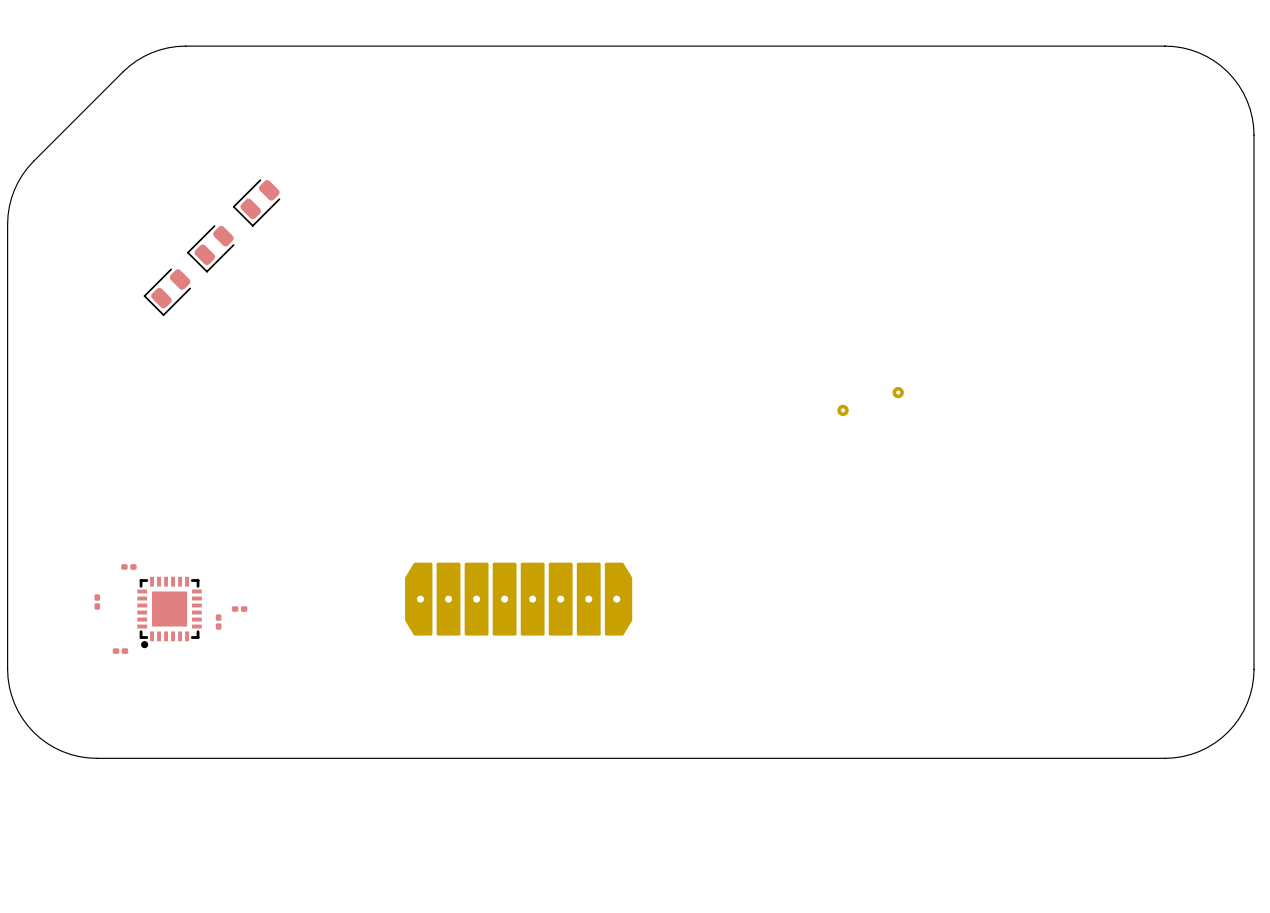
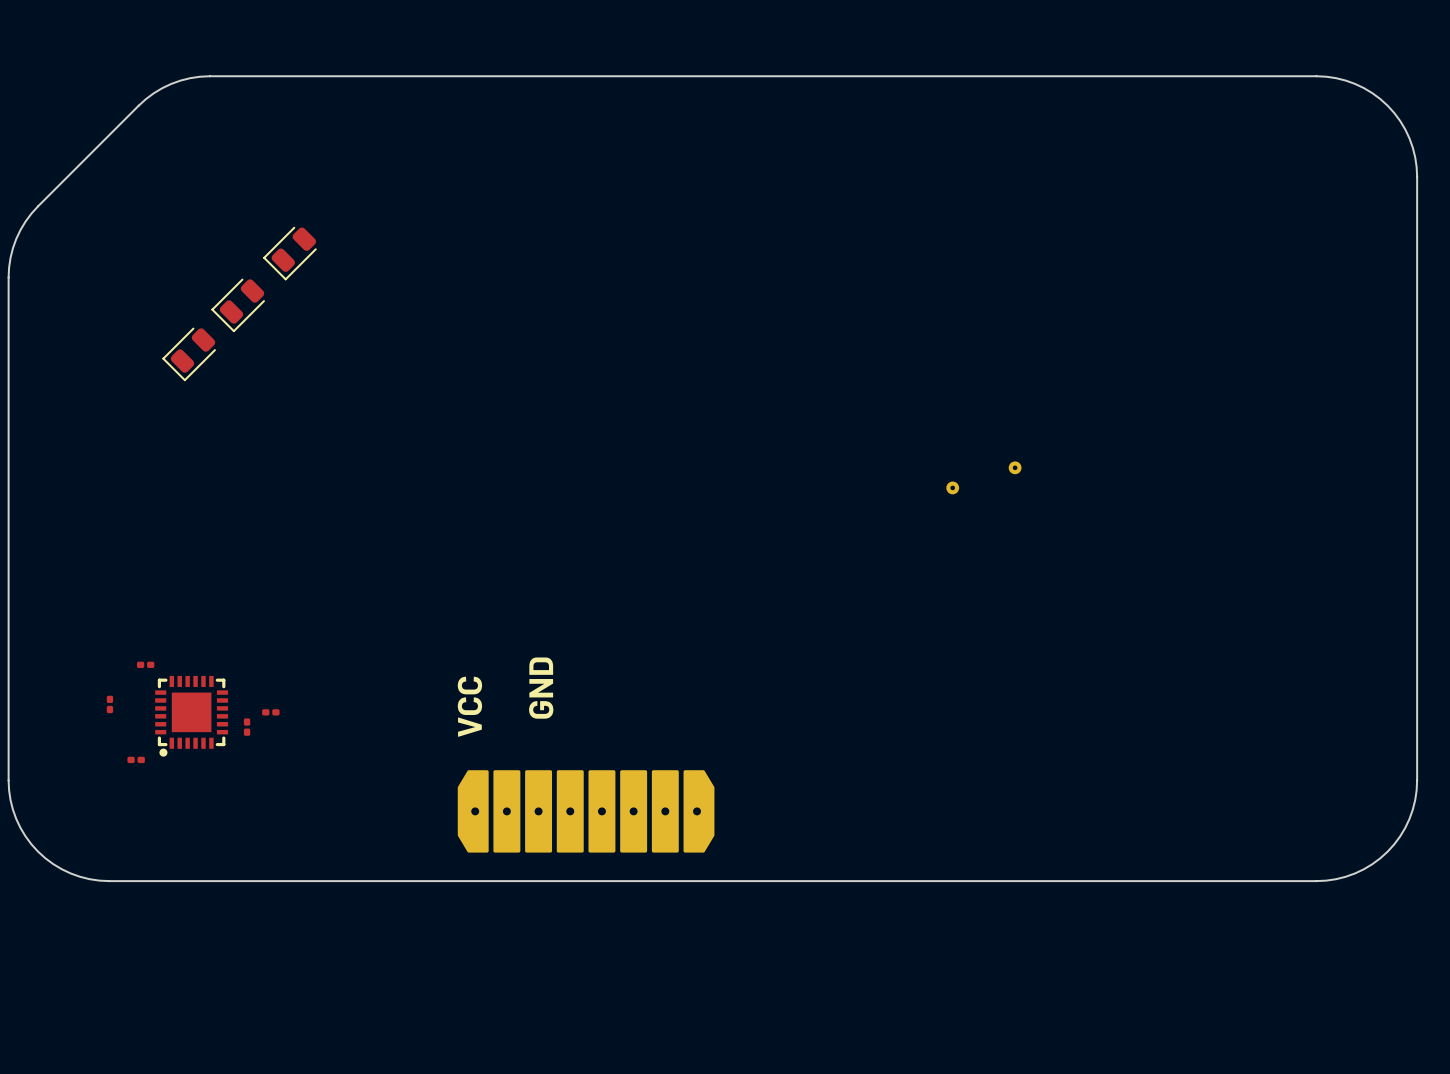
text: none -> GND (541, 688)
part position: (518, 599) -> (586, 811)
text: none -> VCC (469, 706)

